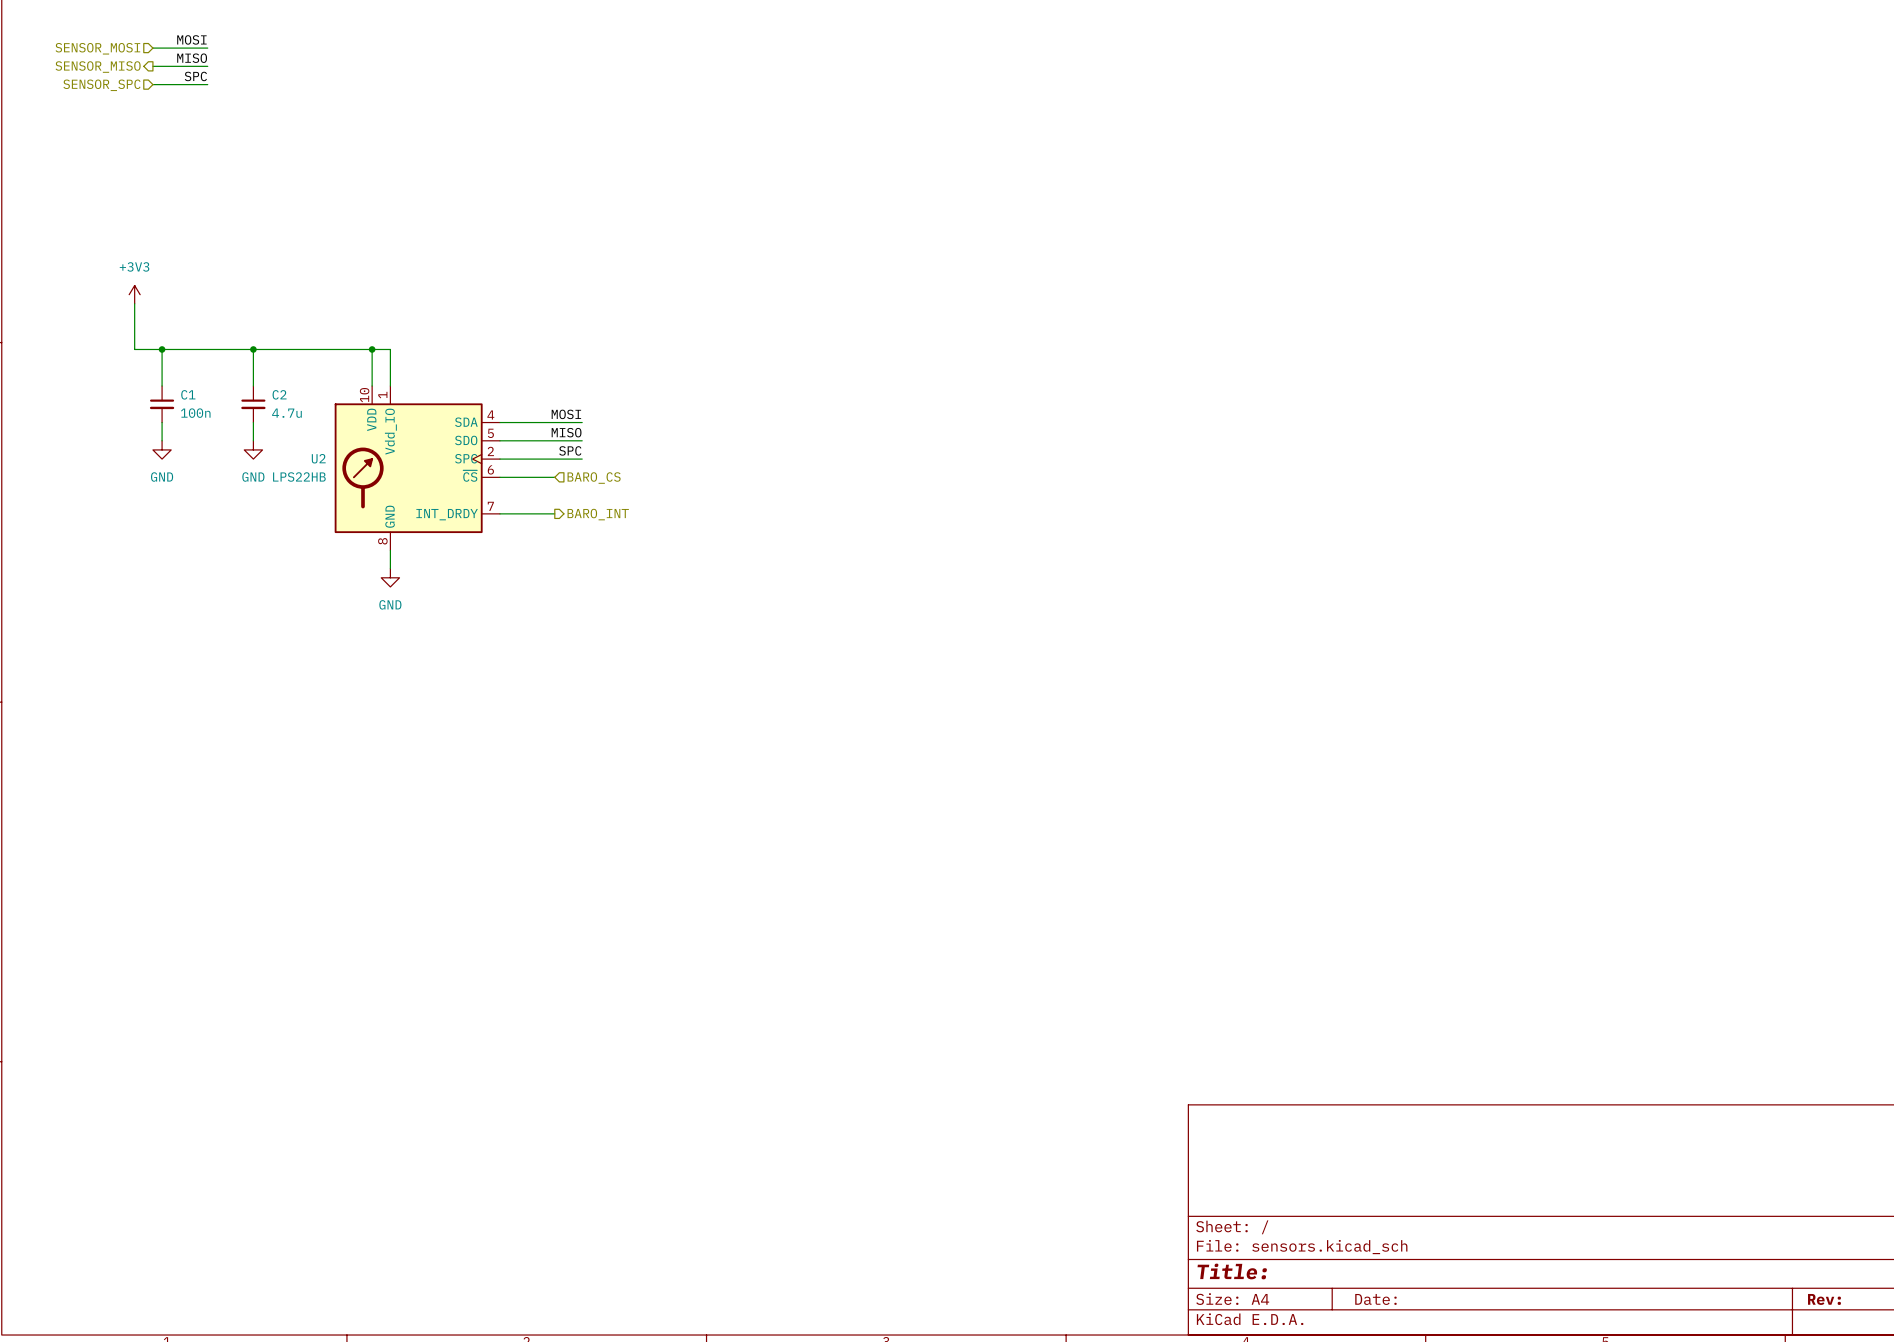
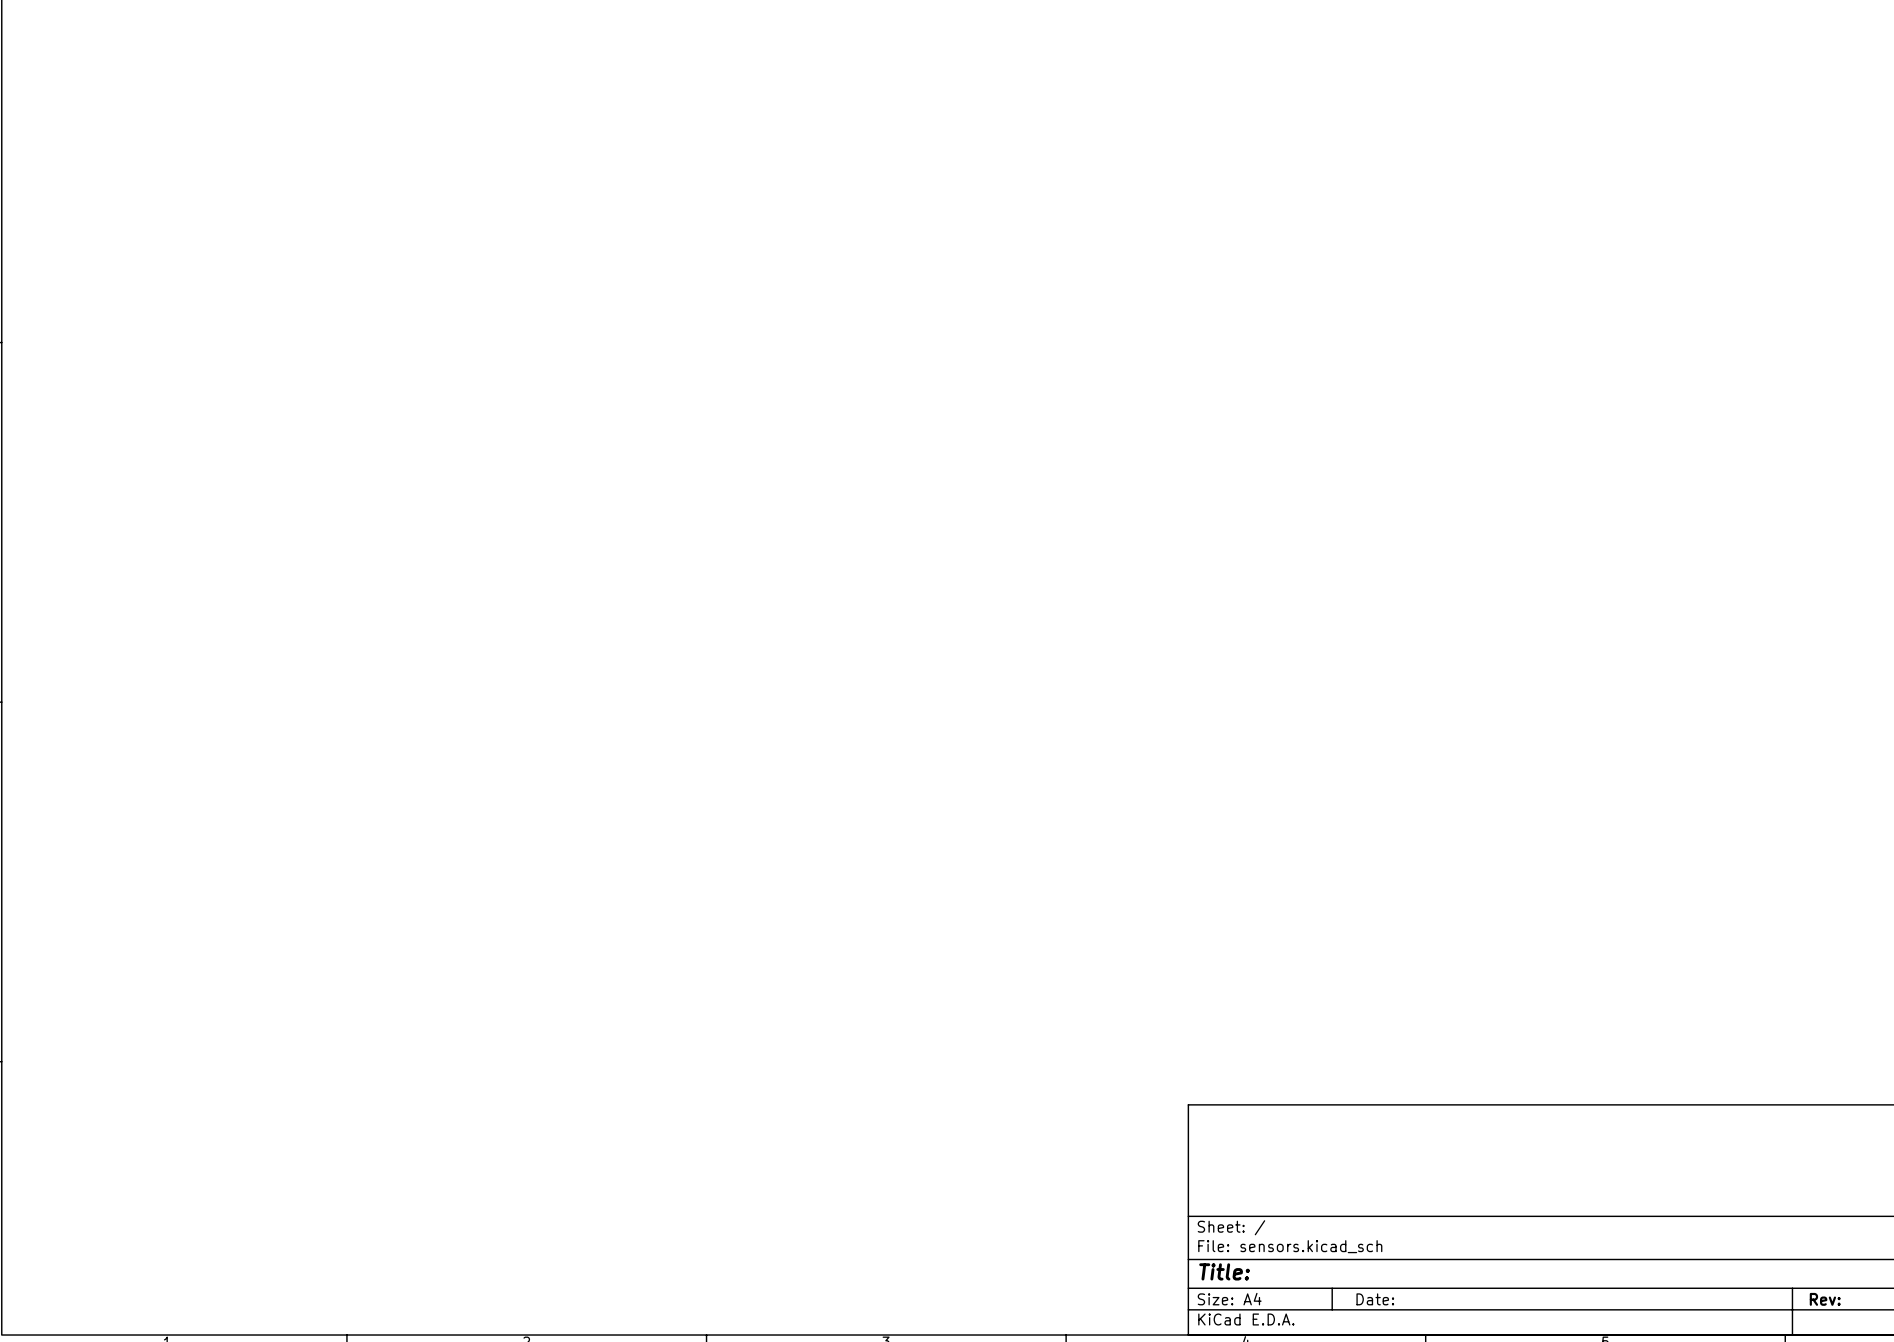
label: MOSI (191, 39) -> none
hierarchical label: SENSOR_MOSI (97, 48) -> none
wire: (152, 48) (207, 48) -> none
label: MISO (192, 58) -> none
wire: (152, 66) (207, 66) -> none
hierarchical label: SENSOR_MISO (98, 67) -> none
label: SPC (195, 76) -> none
wire: (152, 84) (207, 84) -> none
hierarchical label: SENSOR_SPC (101, 85) -> none
power symbol: +3V3 (134, 294) -> none
wire: (134, 303) (134, 349) (390, 349) (390, 386) -> none
wire: (162, 349) (162, 386) -> none
junction: (162, 349) -> none
wire: (253, 349) (253, 386) -> none
junction: (253, 349) -> none
wire: (372, 349) (372, 386) -> none
junction: (372, 349) -> none
C1: 100n (162, 404) -> none
C2: 4.7u (253, 404) -> none
label: MOSI (566, 414) -> none
wire: (162, 422) (162, 440) -> none
wire: (253, 422) (253, 440) -> none
wire: (499, 422) (582, 422) -> none
label: MISO (566, 432) -> none
wire: (499, 440) (582, 440) -> none
power symbol: GND (162, 449) -> none
power symbol: GND (253, 449) -> none
label: SPC (570, 450) -> none
wire: (499, 459) (582, 459) -> none
U2: LPS22HB (417, 468) -> none
wire: (499, 477) (554, 477) -> none
hierarchical label: BARO_CS (594, 478) -> none
wire: (499, 513) (554, 513) -> none
hierarchical label: BARO_INT (598, 514) -> none
wire: (390, 550) (390, 568) -> none
power symbol: GND (390, 577) -> none

